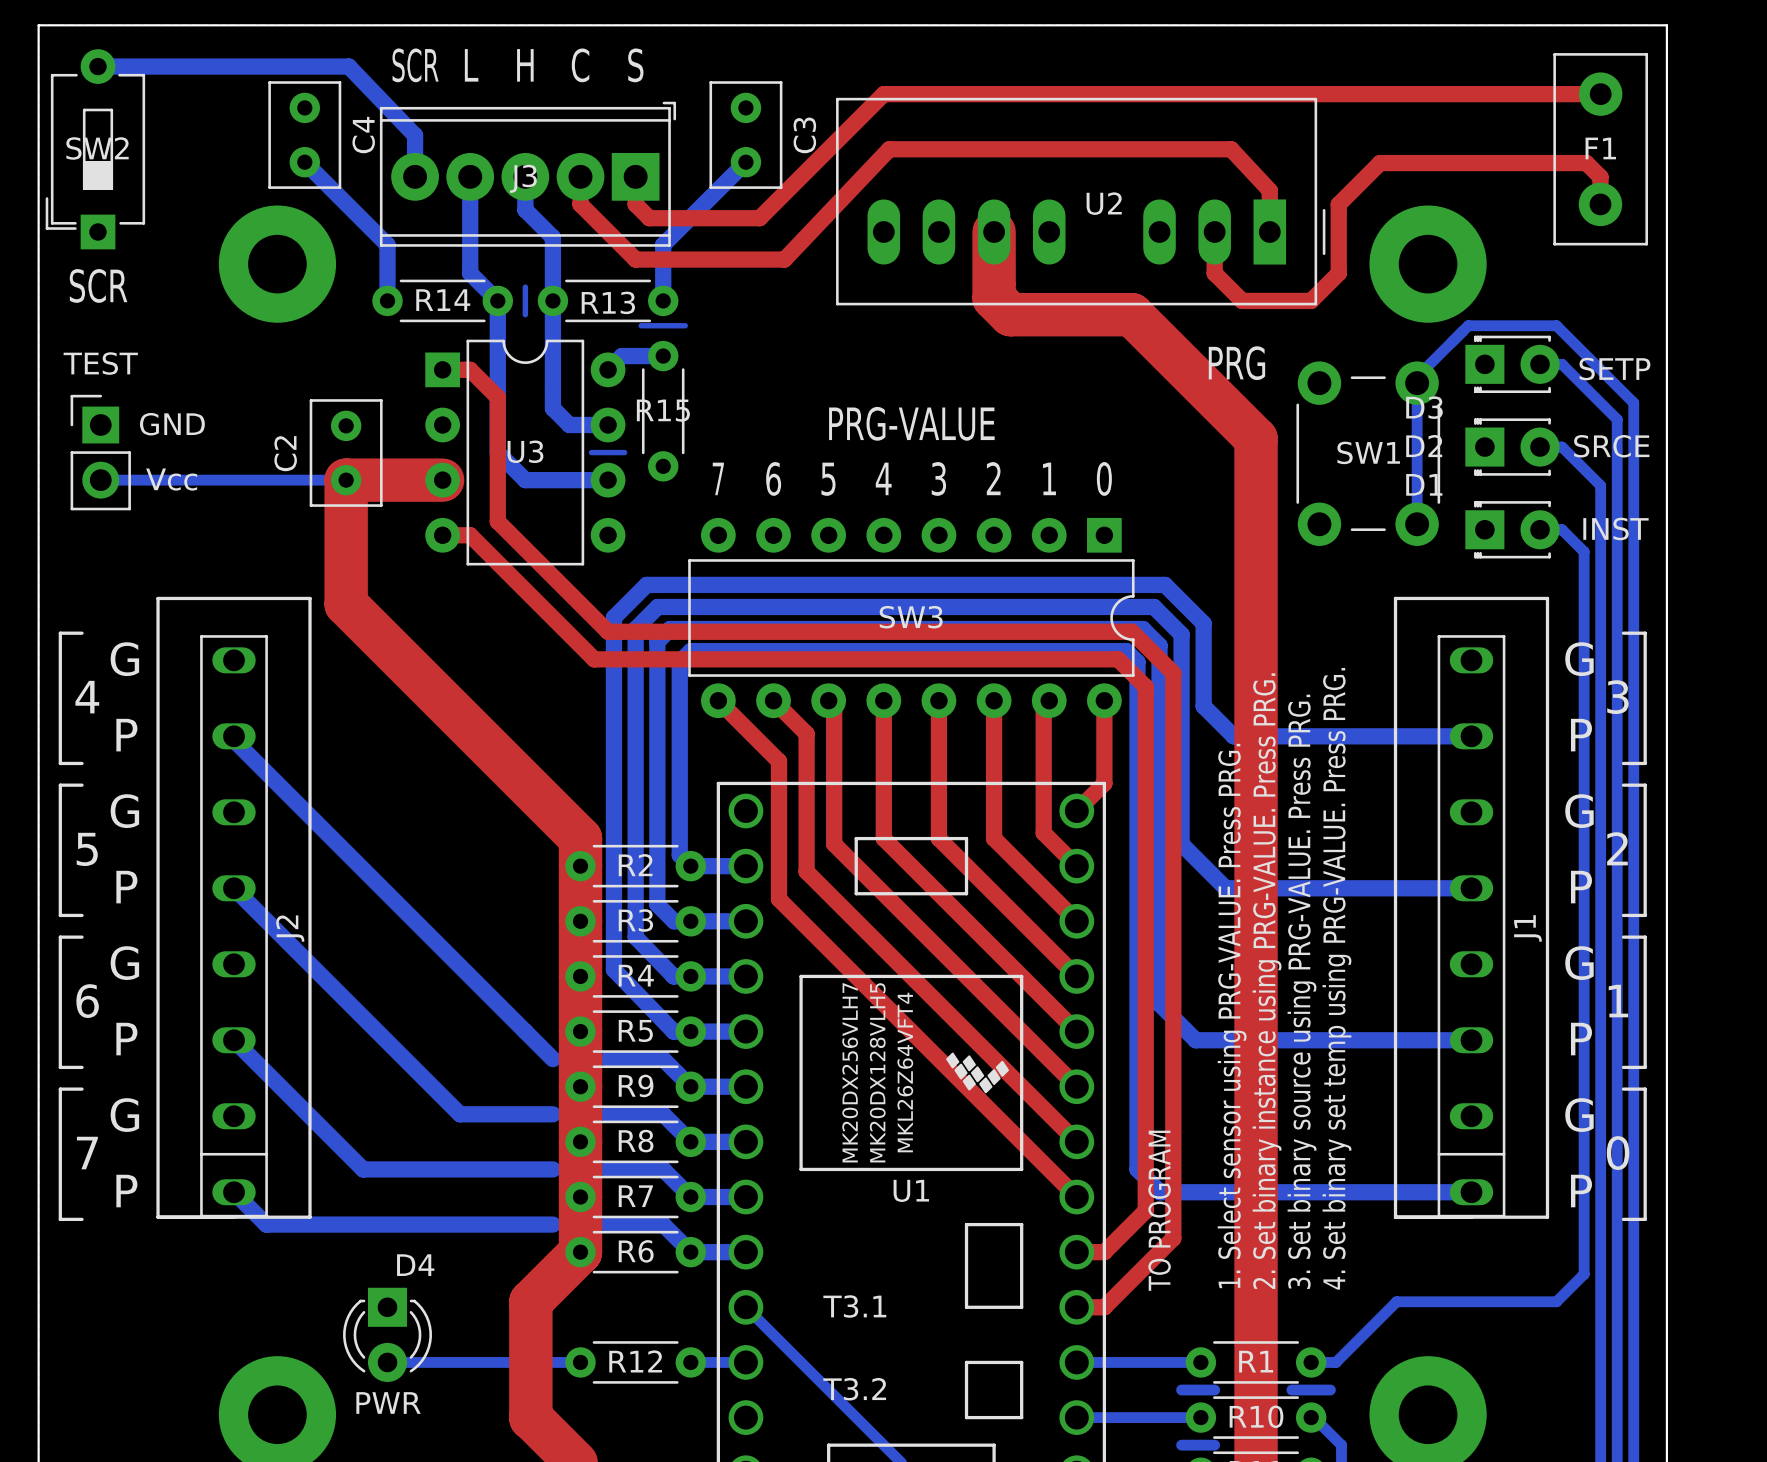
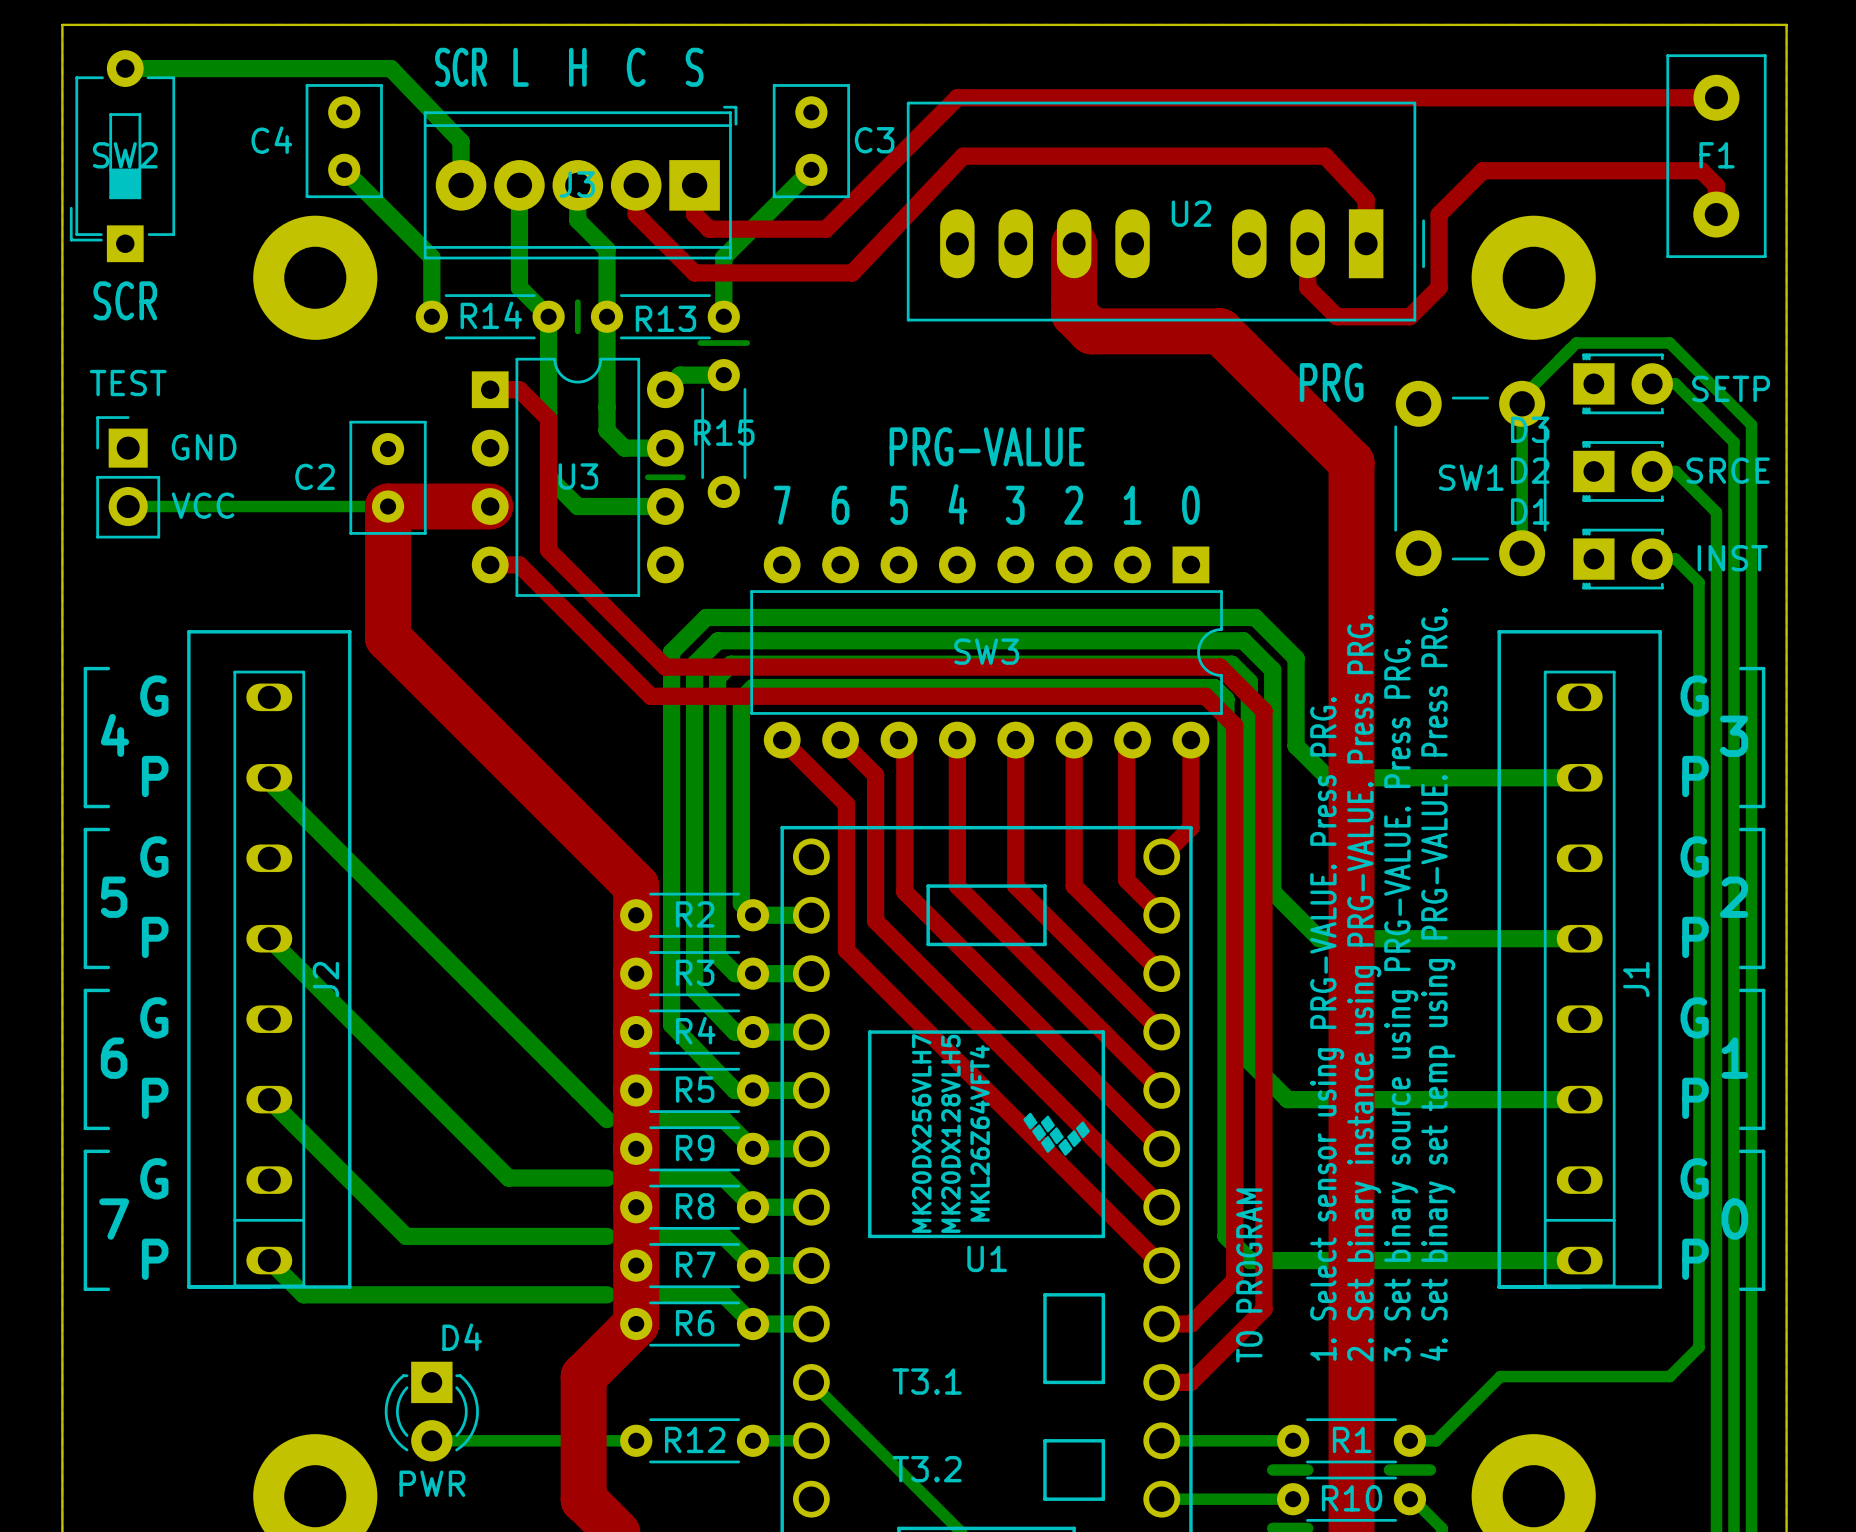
C4 name rotation: 0° (363, 135) -> 90° clockwise (271, 140)
C4 name position: C4 (363, 135) -> C4 (271, 140)
C3 name rotation: 0° (804, 135) -> 90° clockwise (874, 140)
C2 name rotation: 0° (285, 453) -> 90° clockwise (315, 476)
text: Vcc (171, 479) -> VCC (203, 505)

